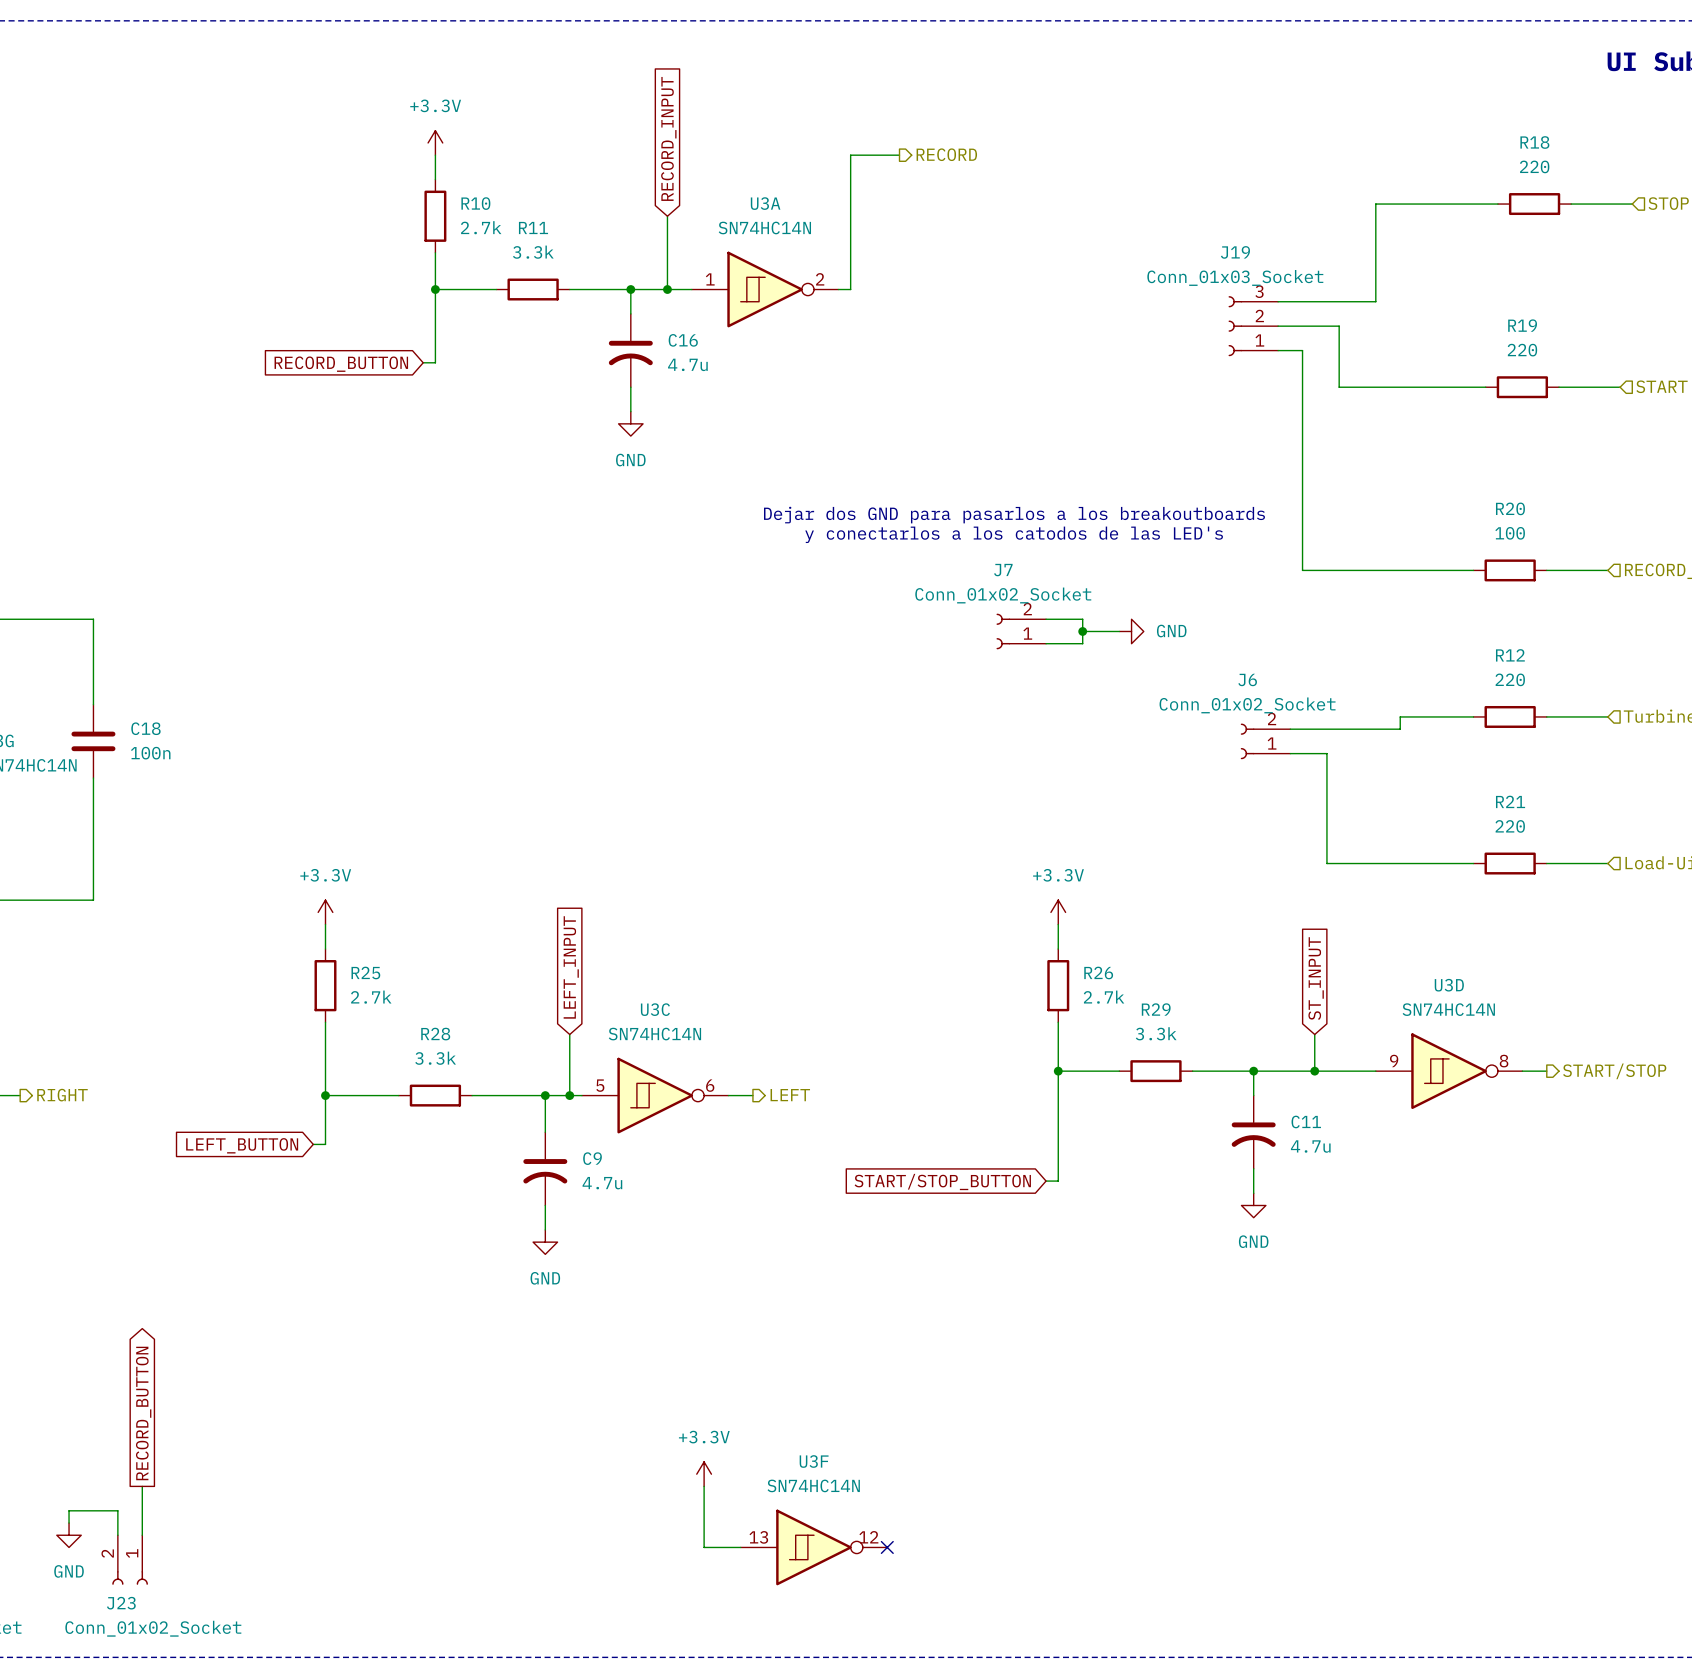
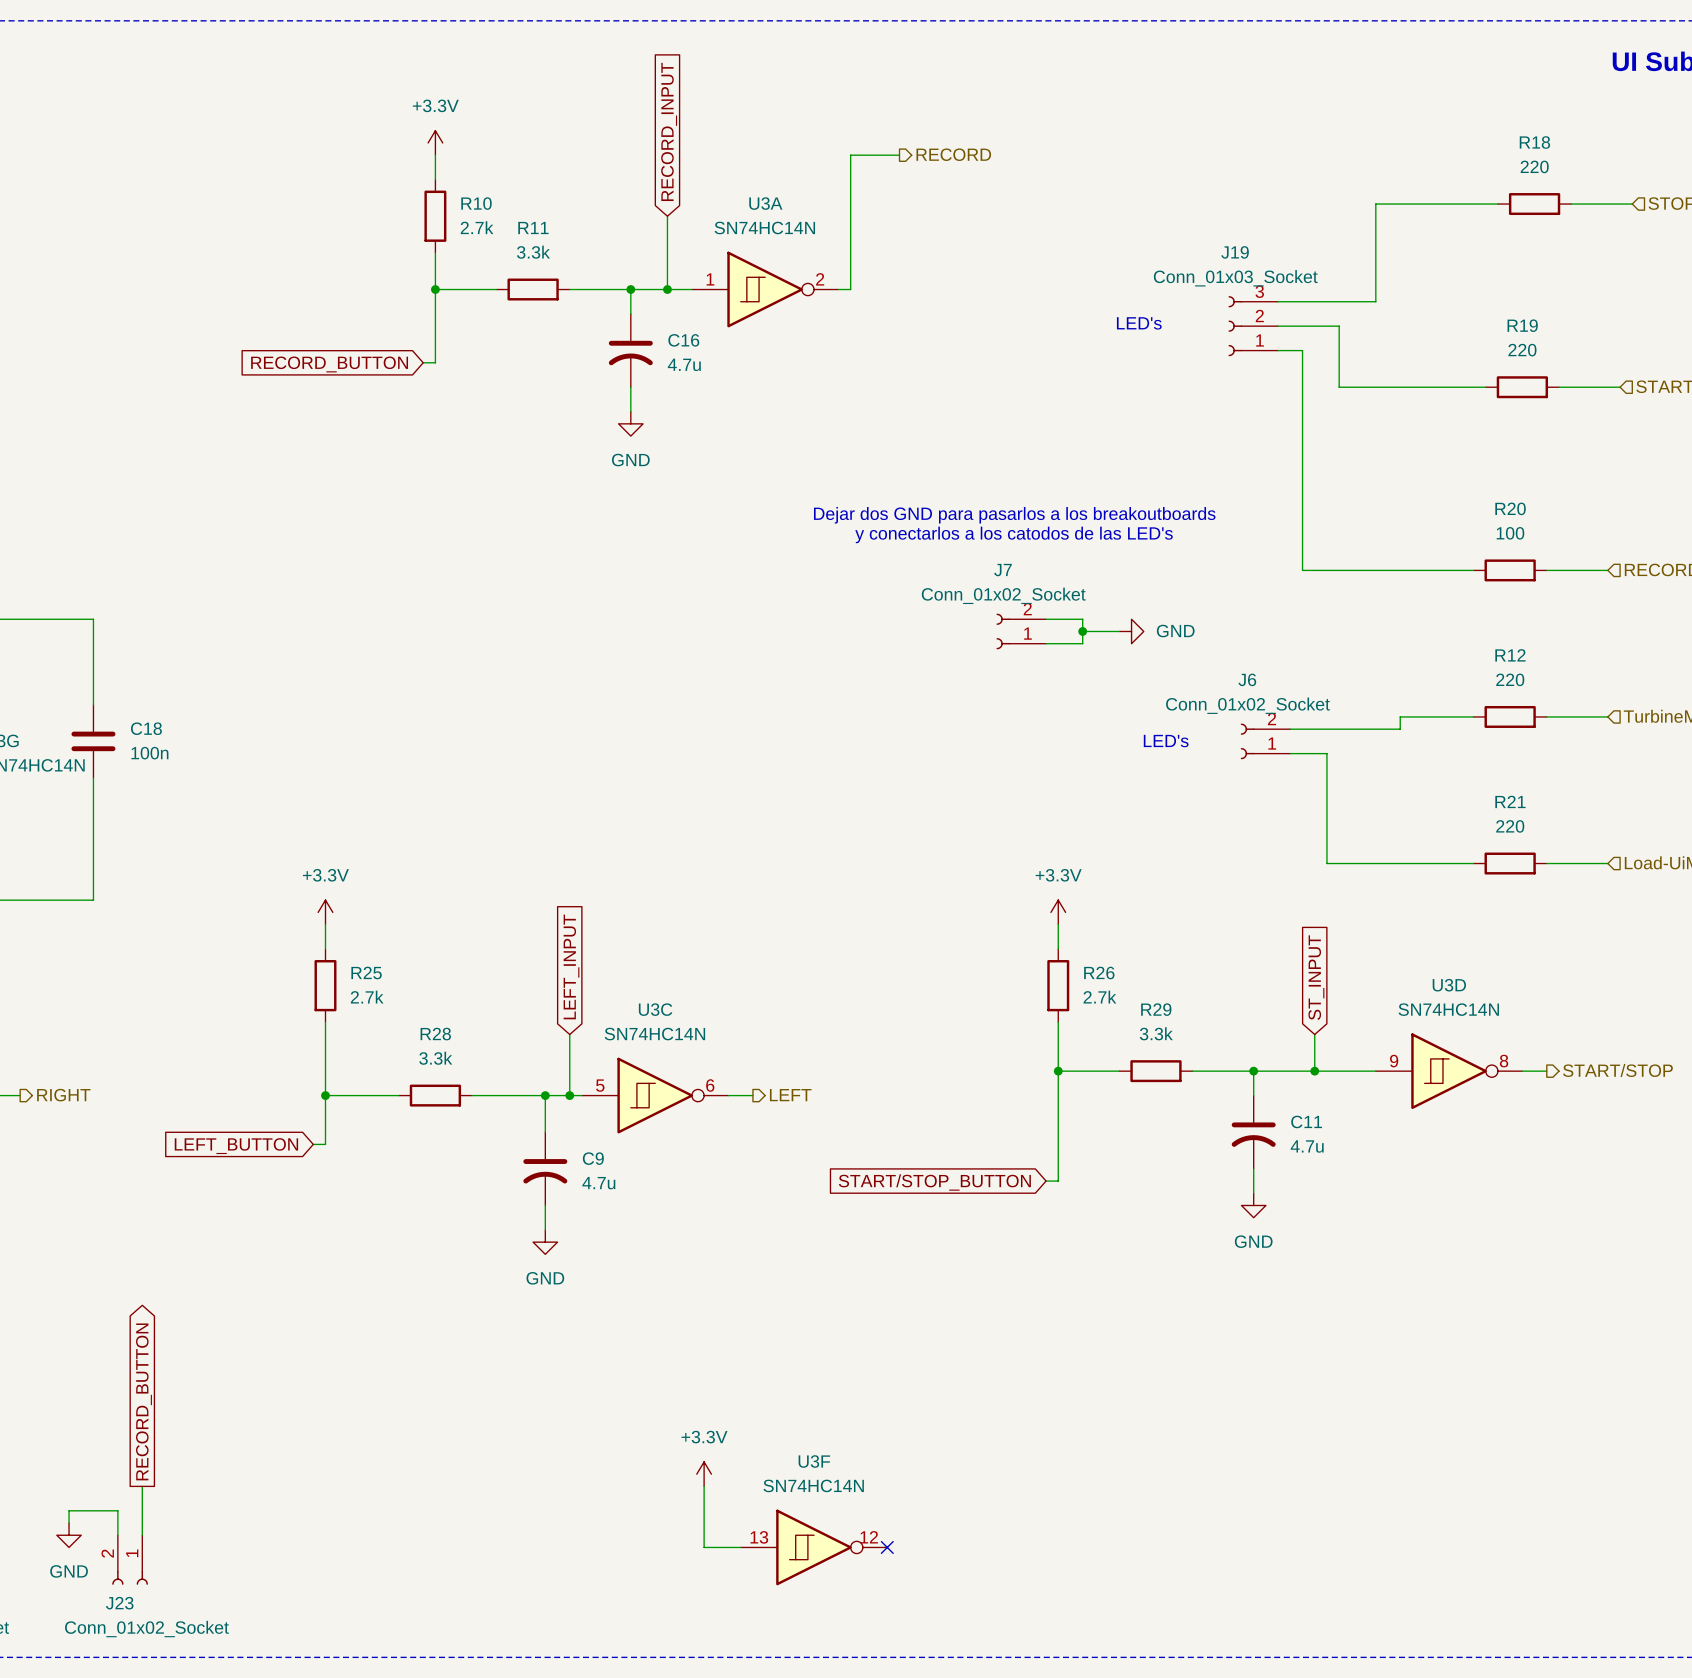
text: none -> LED's (1139, 323)
text: none -> LED's (1166, 741)

